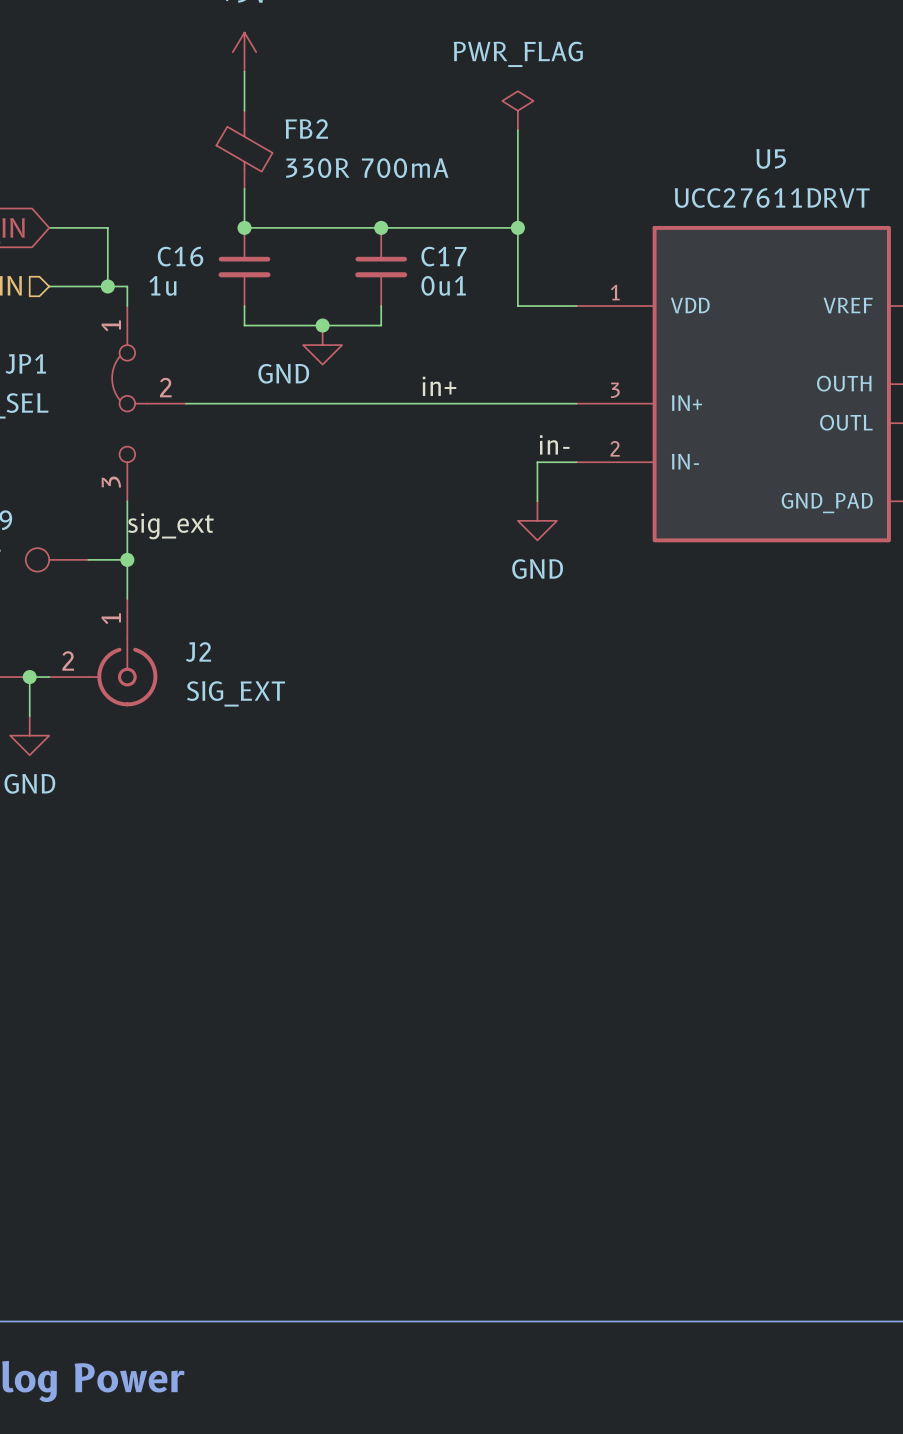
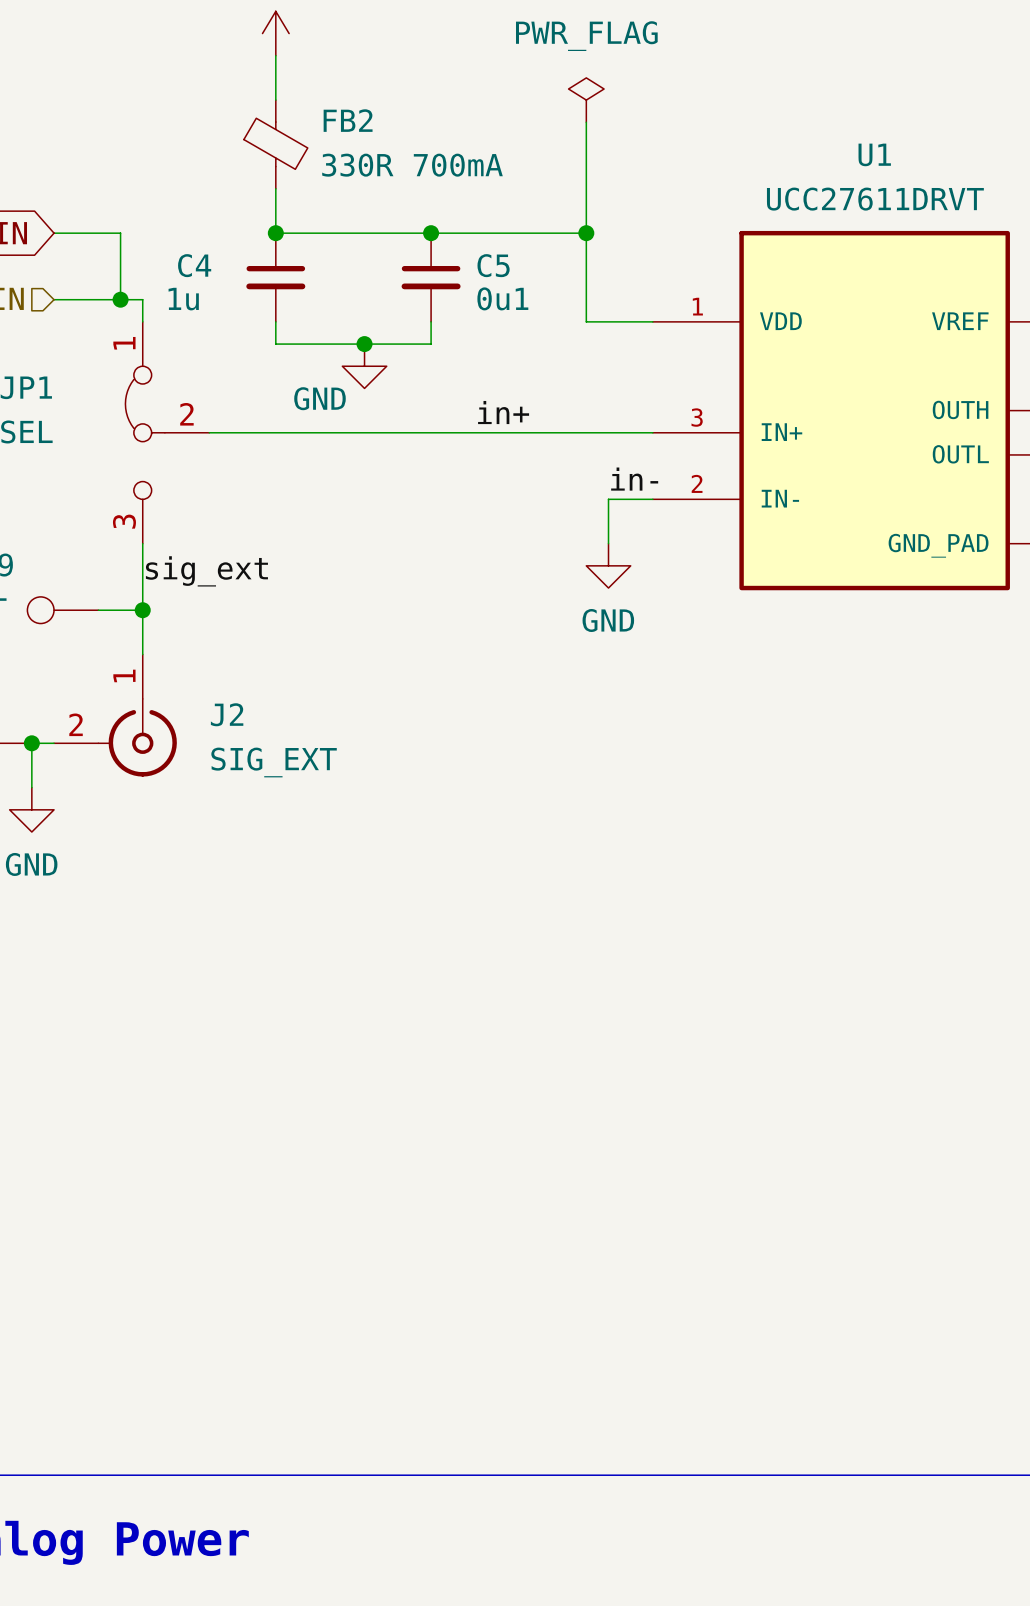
U5 name: U5 (771, 158) -> U1 (874, 154)
C16 name: C16 (180, 256) -> C4 (194, 265)
C17 name: C17 (443, 256) -> C5 (493, 265)

